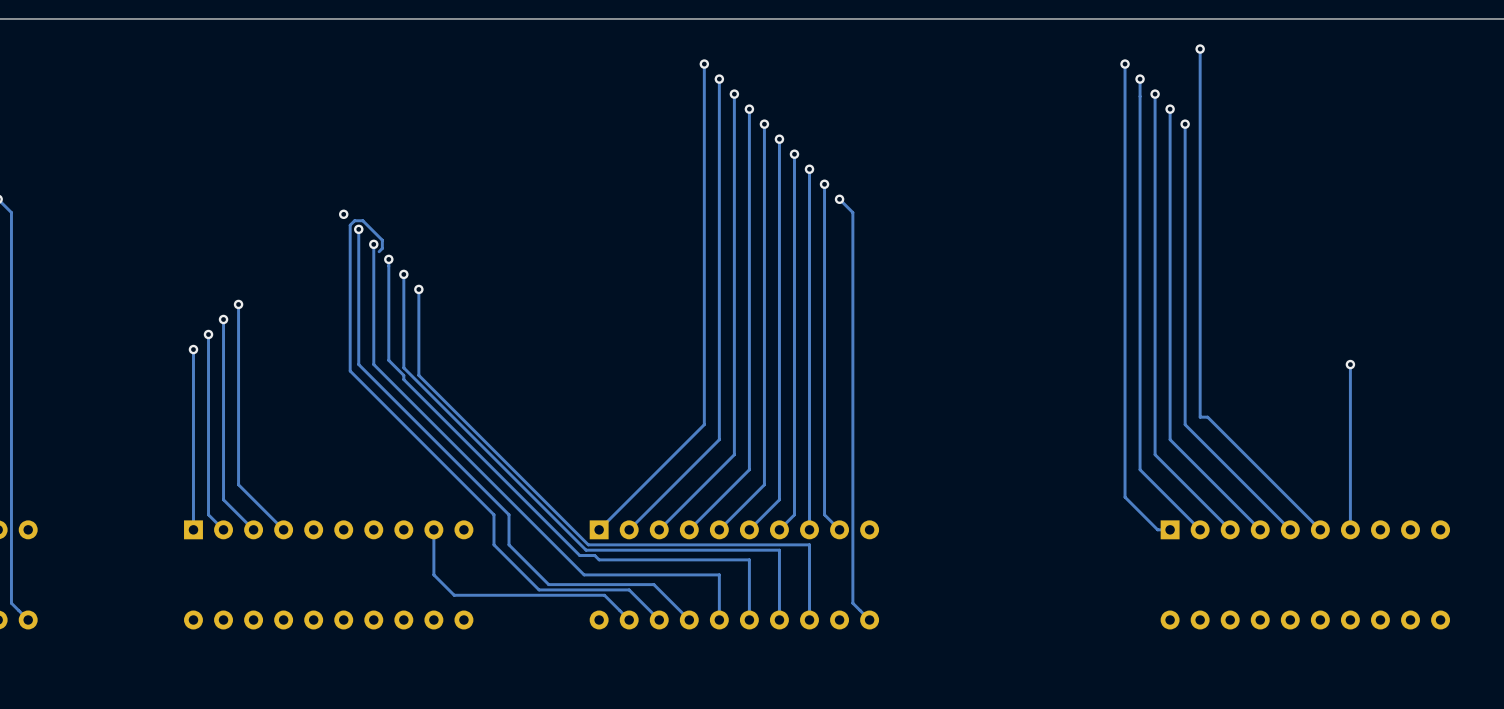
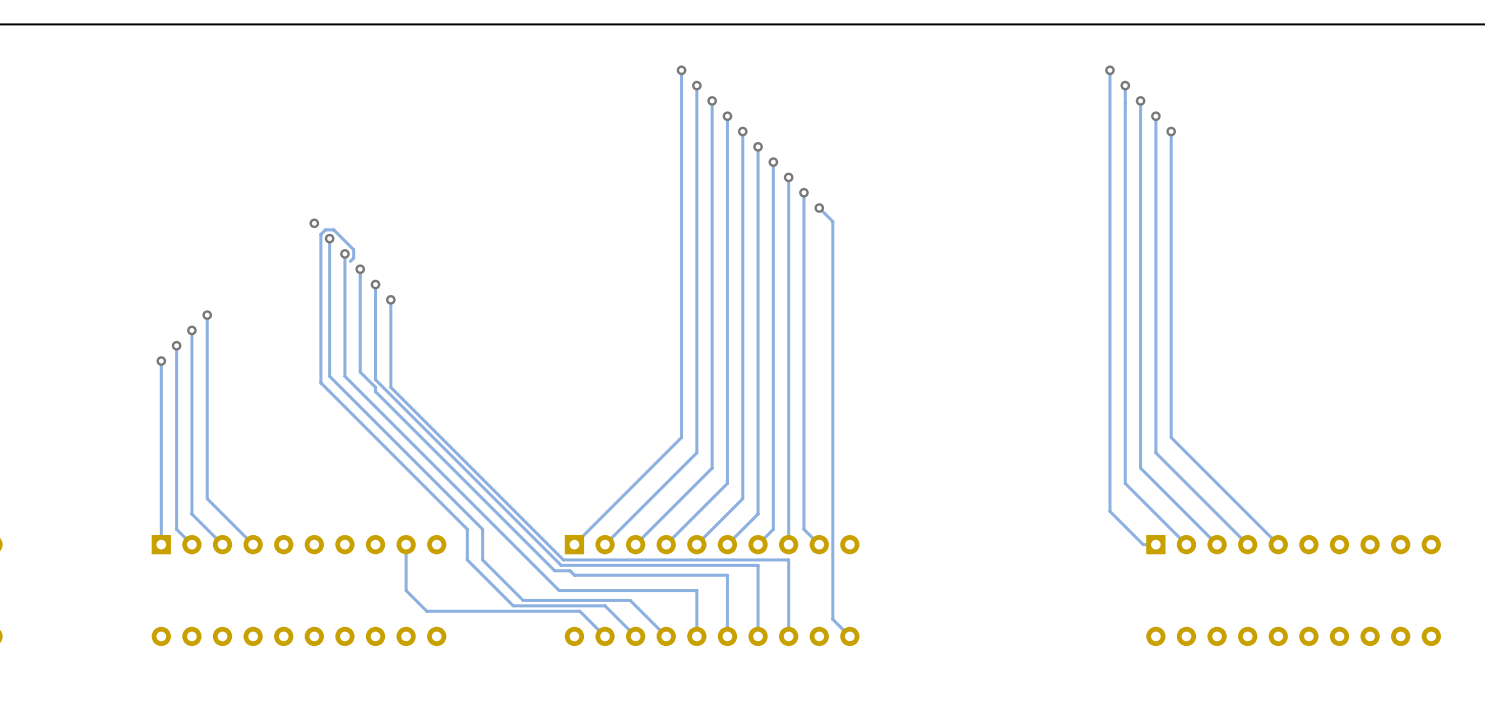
track: (1200, 49) (1200, 417) (1207, 417) (1320, 529) -> none
via: (1200, 49) -> none
track: (1350, 364) (1350, 529) -> none
via: (1350, 364) -> none

